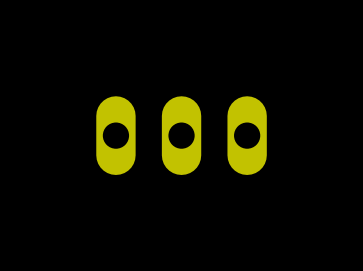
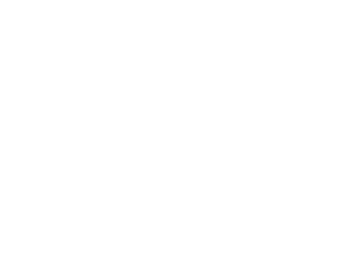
part: (181, 135) -> none

